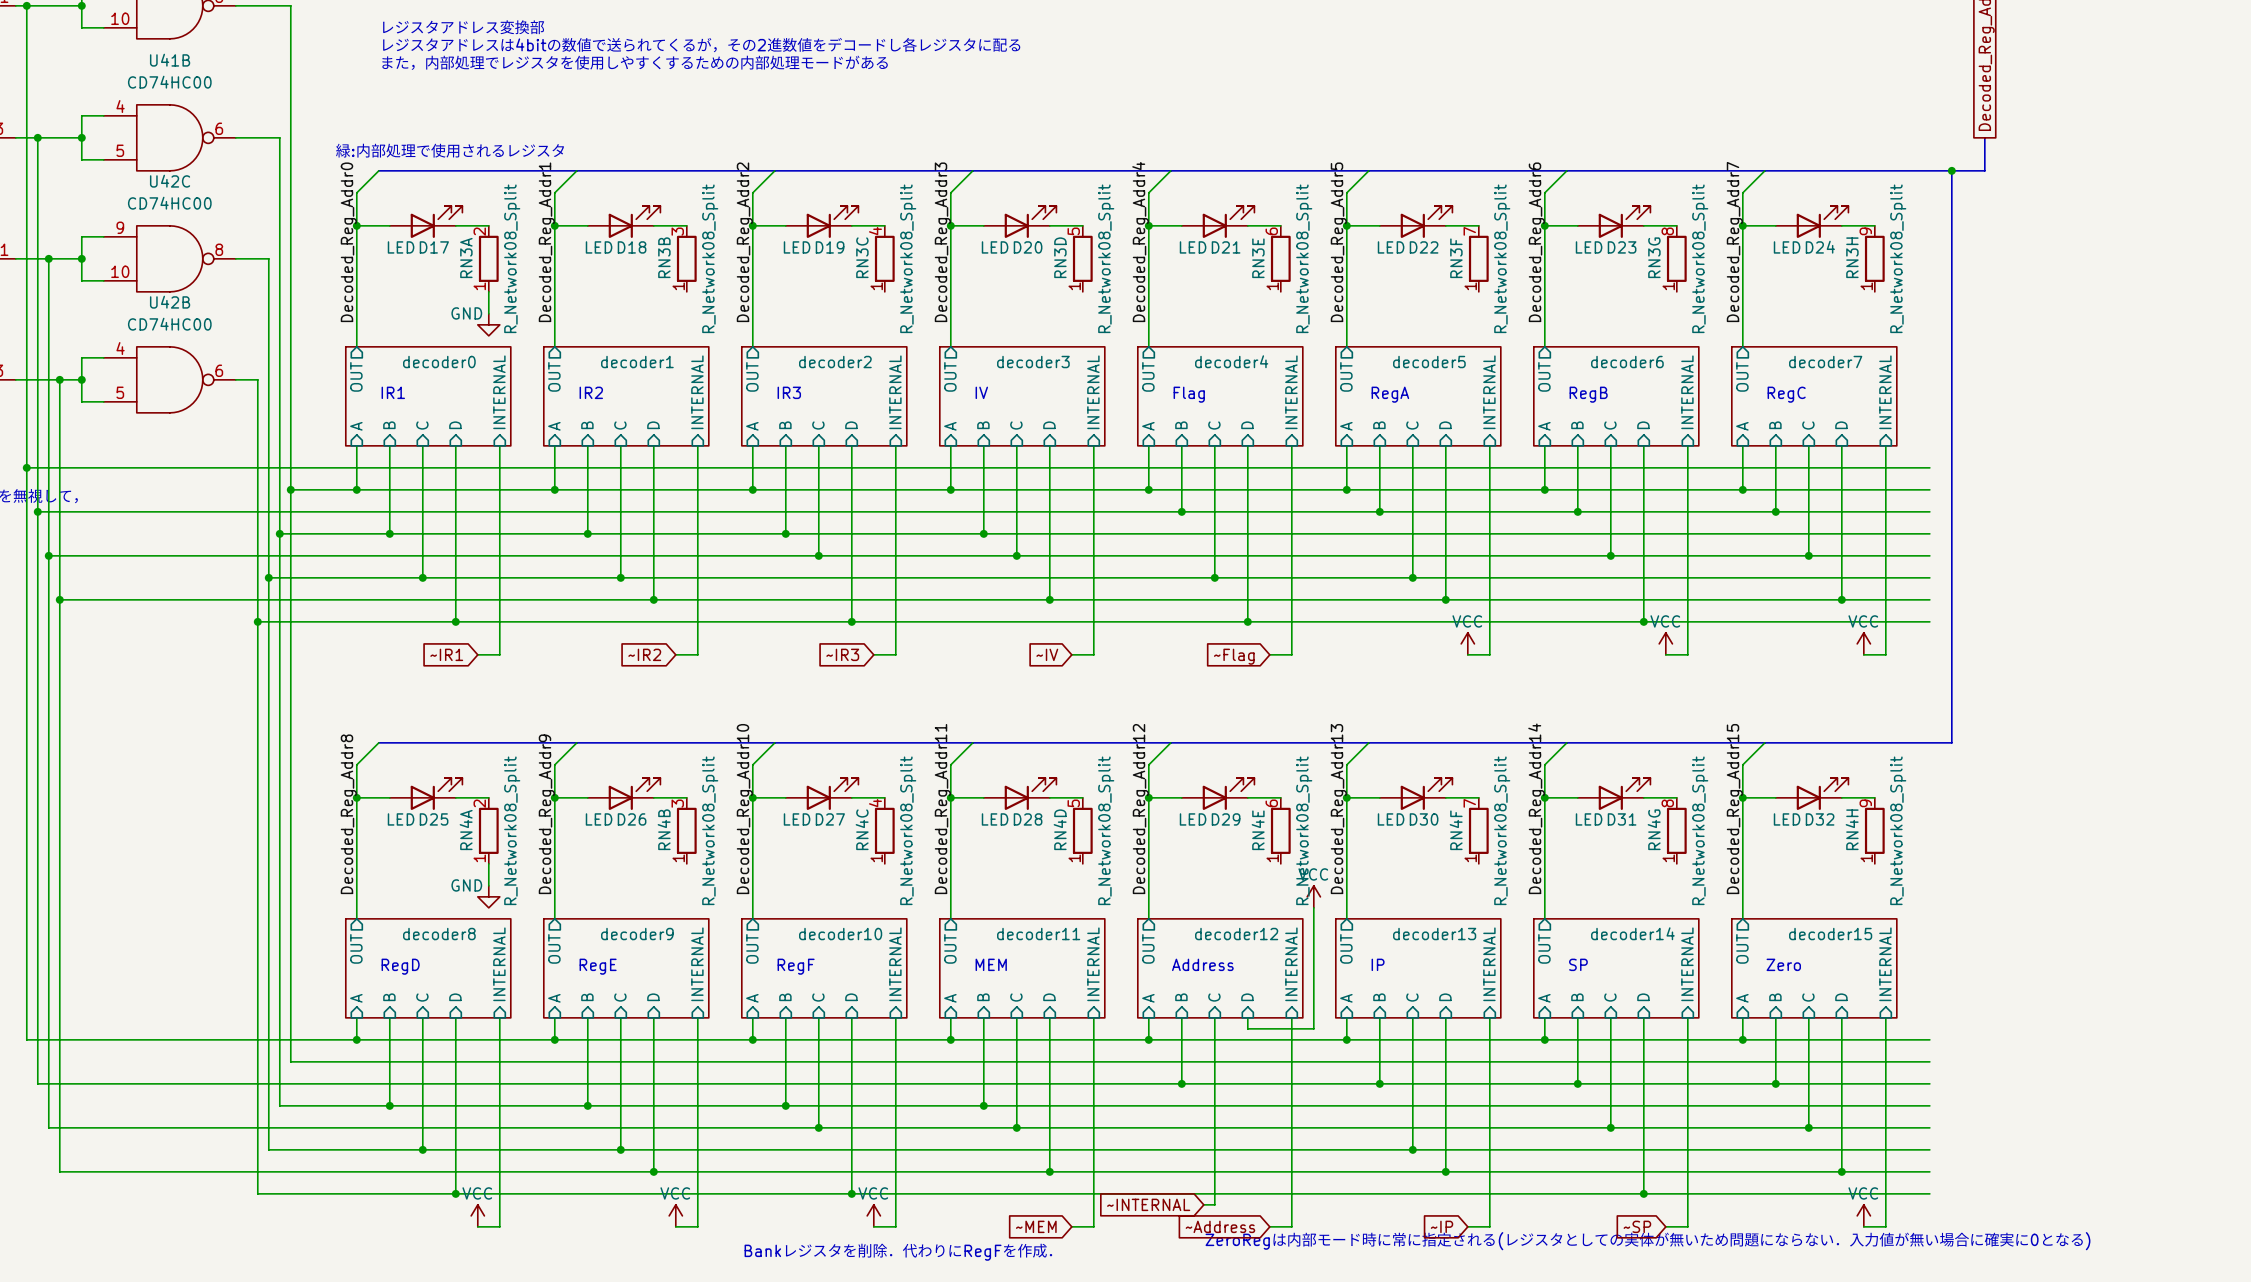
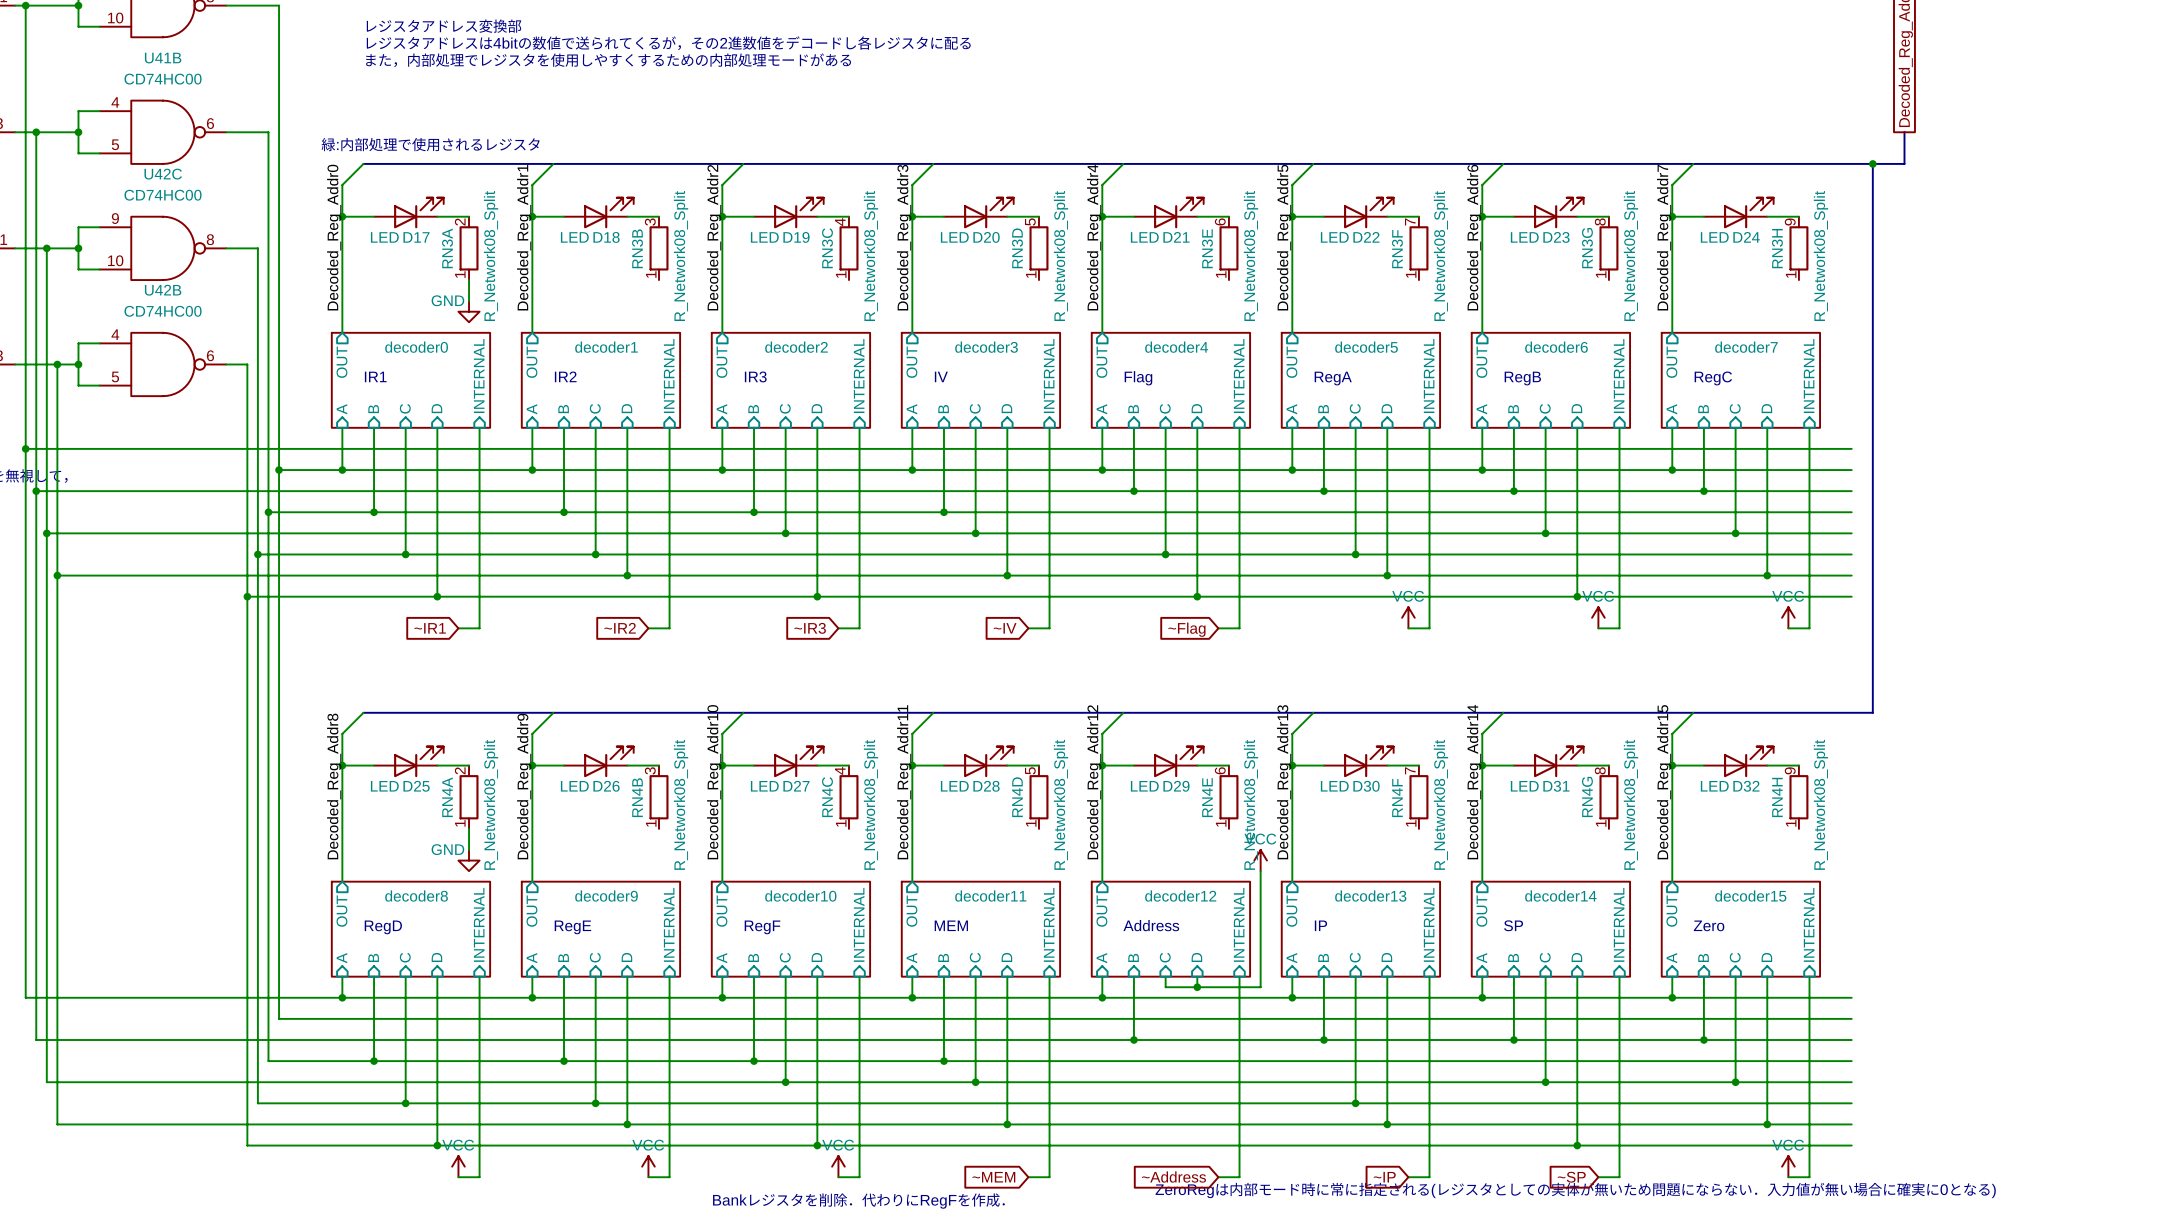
wire: (1214, 1028) (1214, 1204) (1203, 1204) -> (1165, 987) (1197, 987)
junction: none -> (1197, 987)
global label: ~INTERNAL (1148, 1204) -> none

